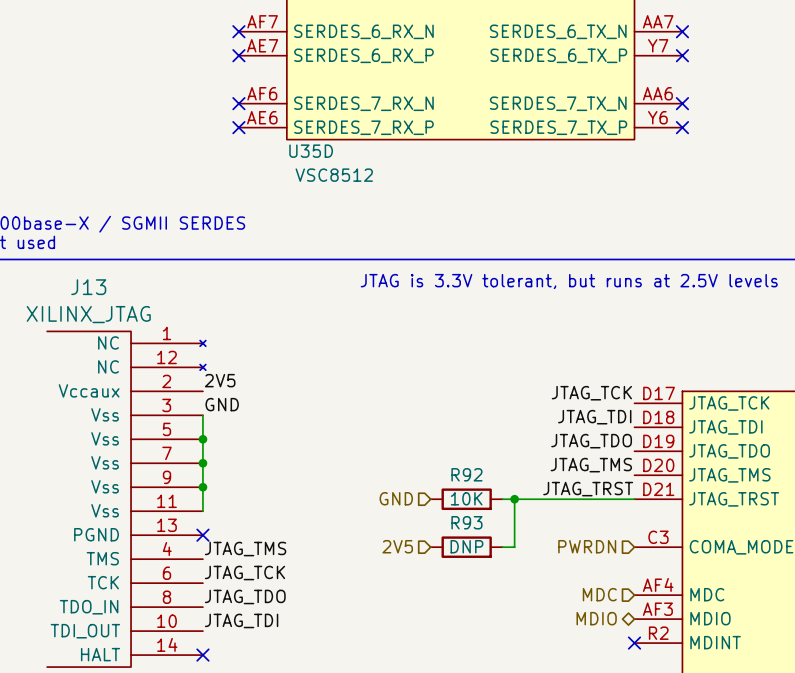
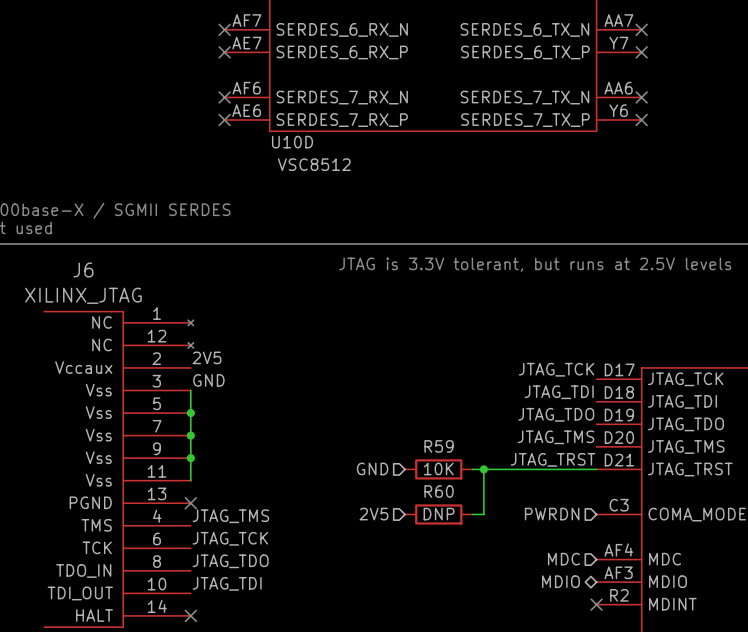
U35D name: U35D (311, 151) -> U10D (292, 142)
J13 name: J13 (88, 287) -> J6 (83, 270)
R92 name: R92 (466, 474) -> R59 (439, 446)
R93 name: R93 (466, 522) -> R60 (439, 491)

